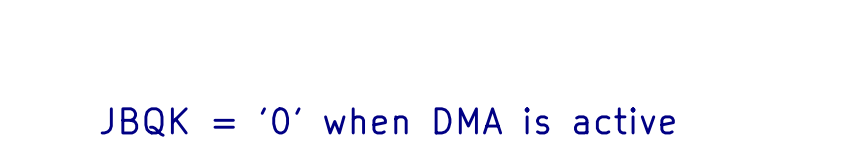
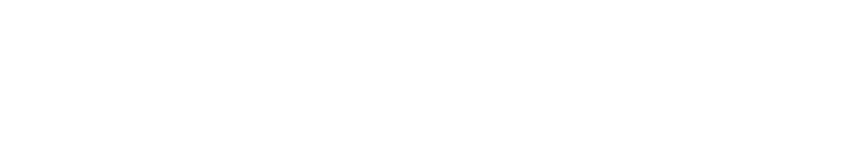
text: JBQK = '0' when DMA is active (387, 122) -> none

